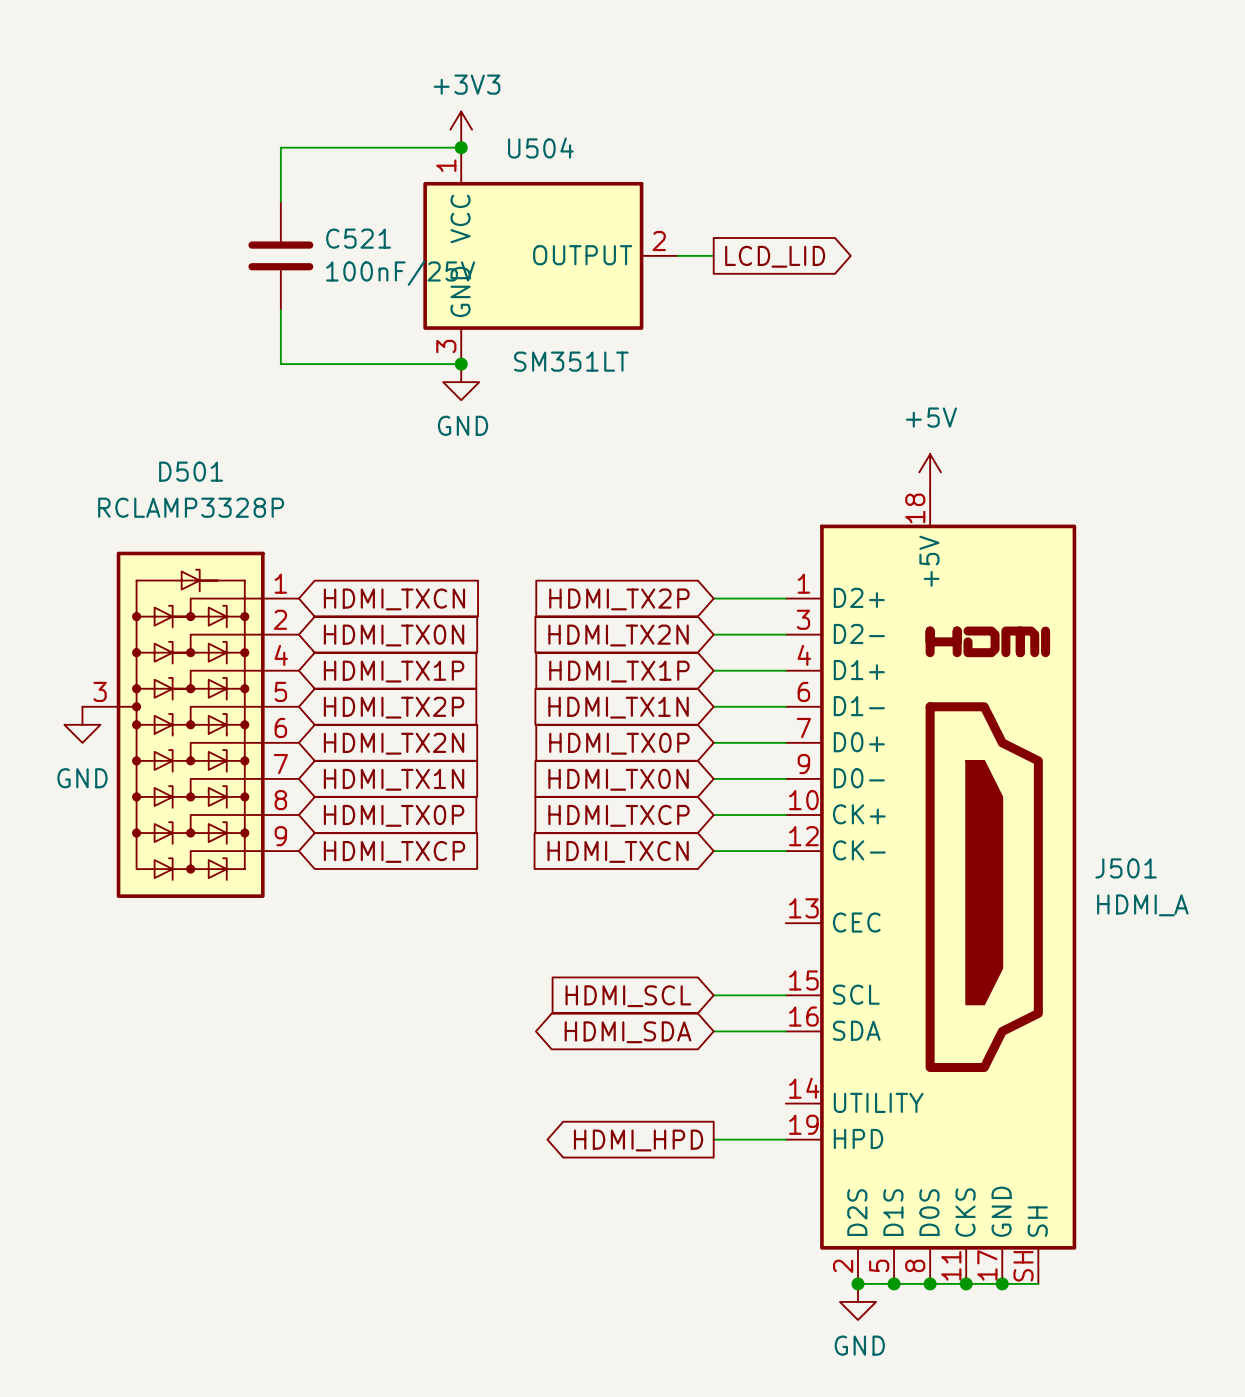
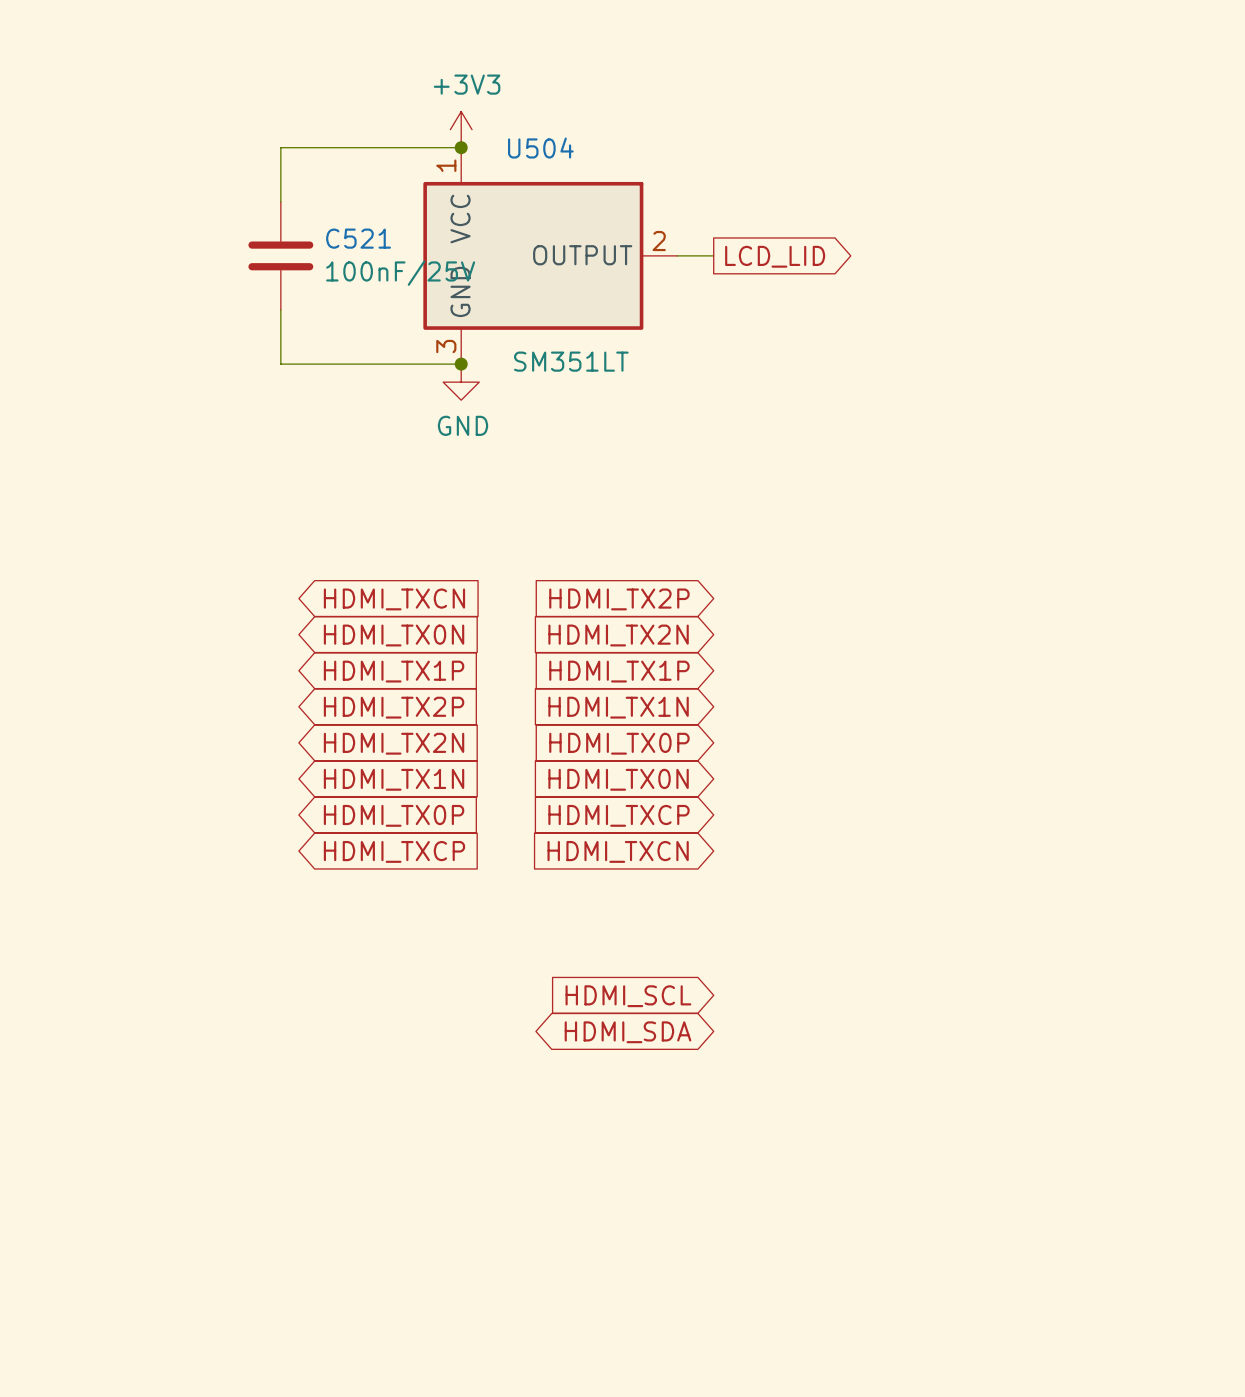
power symbol: +5V (930, 472) -> none
wire: (713, 598) (785, 598) -> none
wire: (713, 634) (785, 634) -> none
wire: (713, 670) (785, 670) -> none
wire: (713, 706) (785, 706) -> none
power symbol: GND (82, 724) -> none
D501: RCLAMP3328P (190, 724) -> none
wire: (713, 742) (785, 742) -> none
wire: (713, 778) (785, 778) -> none
wire: (713, 815) (785, 815) -> none
wire: (713, 851) (785, 851) -> none
J501: HDMI_A (931, 887) -> none
wire: (713, 995) (785, 995) -> none
wire: (713, 1031) (785, 1031) -> none
wire: (713, 1139) (785, 1139) -> none
global label: HDMI_HPD (638, 1140) -> none
wire: (857, 1283) (1038, 1283) -> none
junction: (857, 1283) -> none
junction: (894, 1283) -> none
junction: (930, 1283) -> none
junction: (966, 1283) -> none
junction: (1002, 1283) -> none
power symbol: GND (857, 1301) -> none

